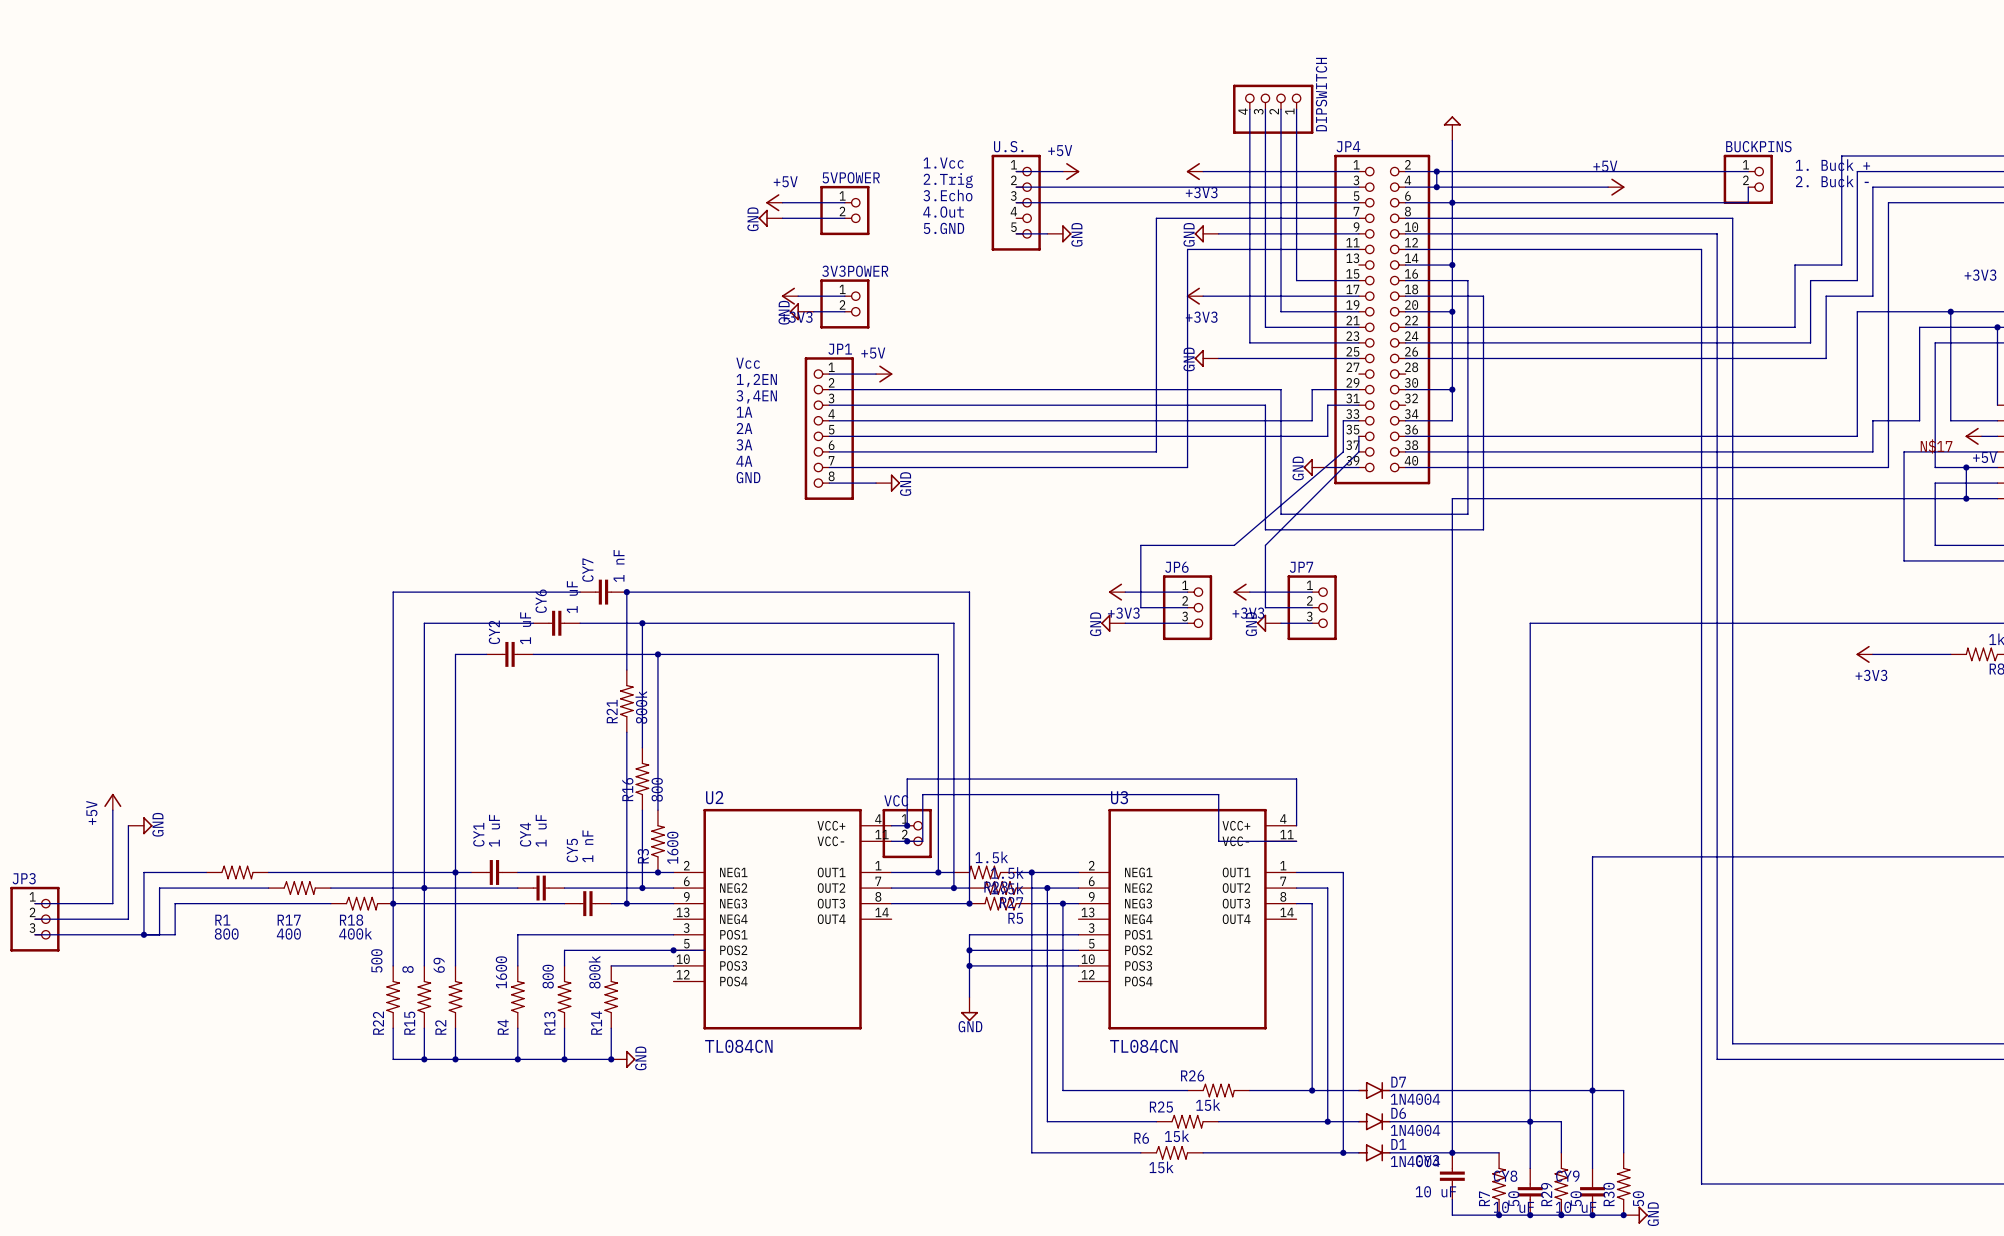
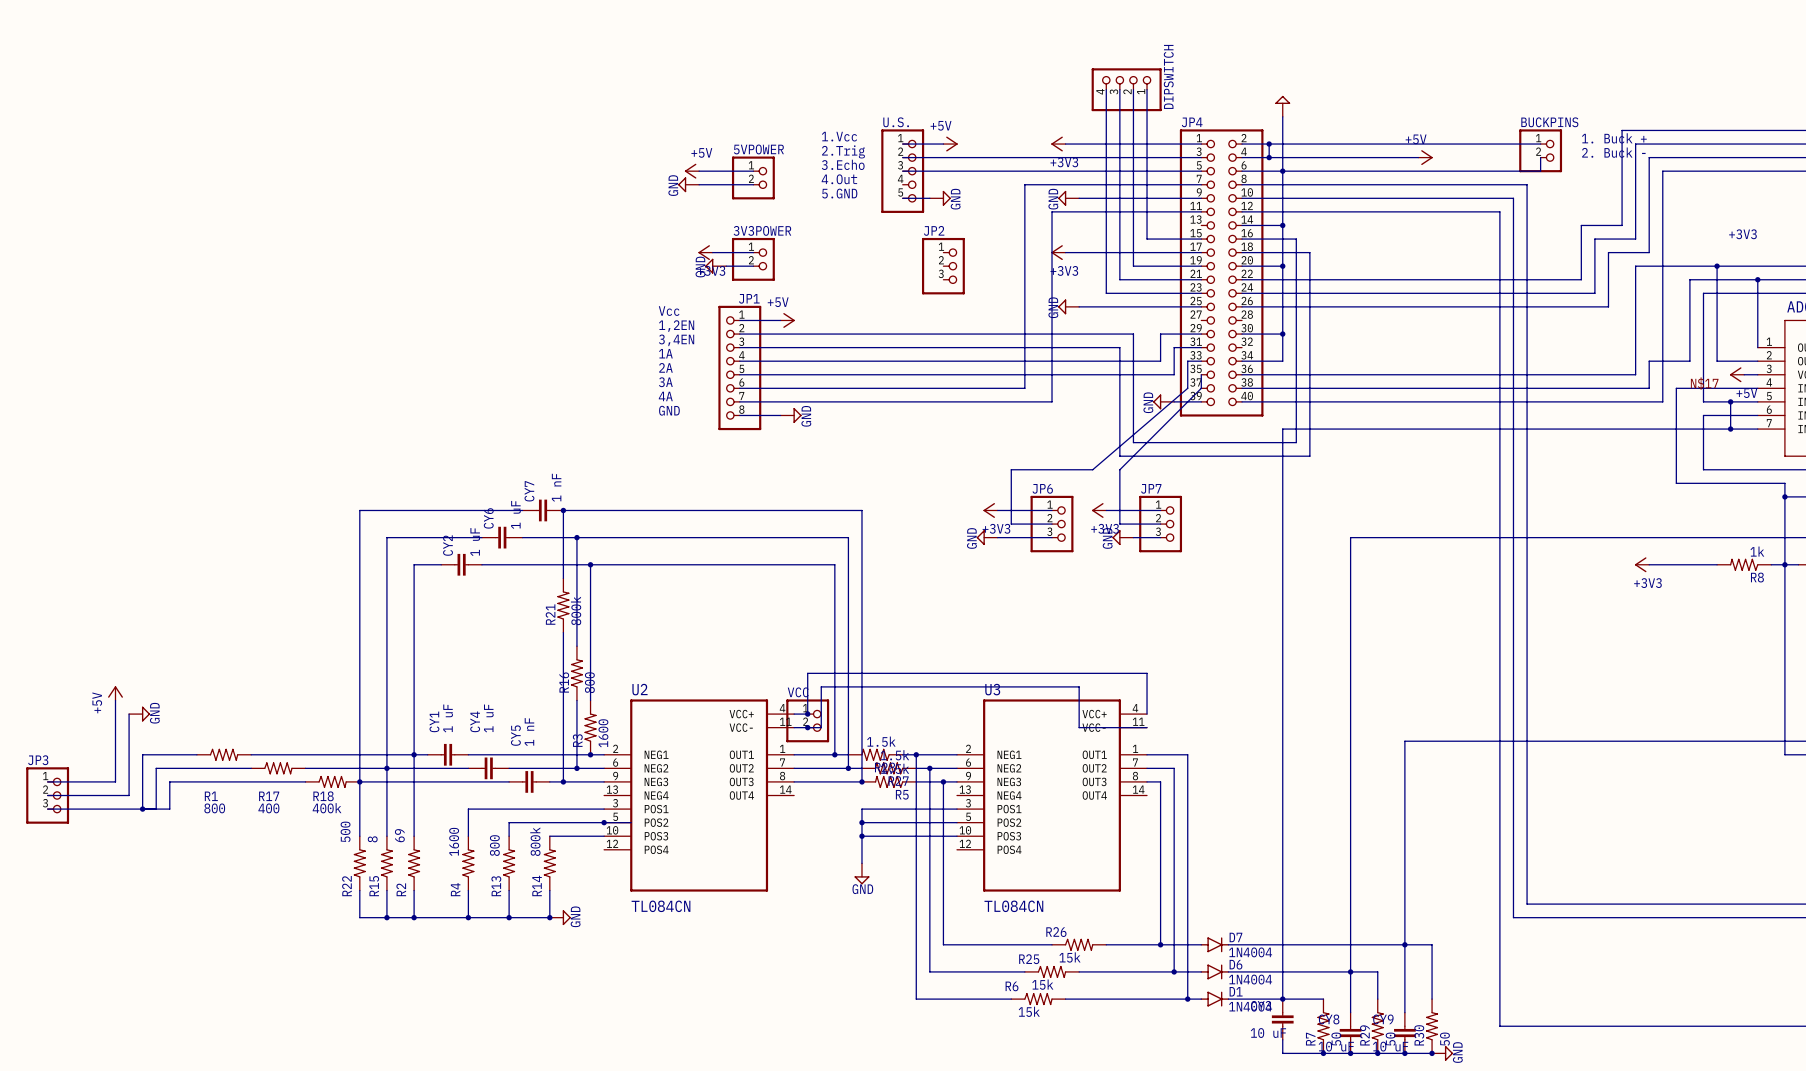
JP2: none -> (943, 266)

